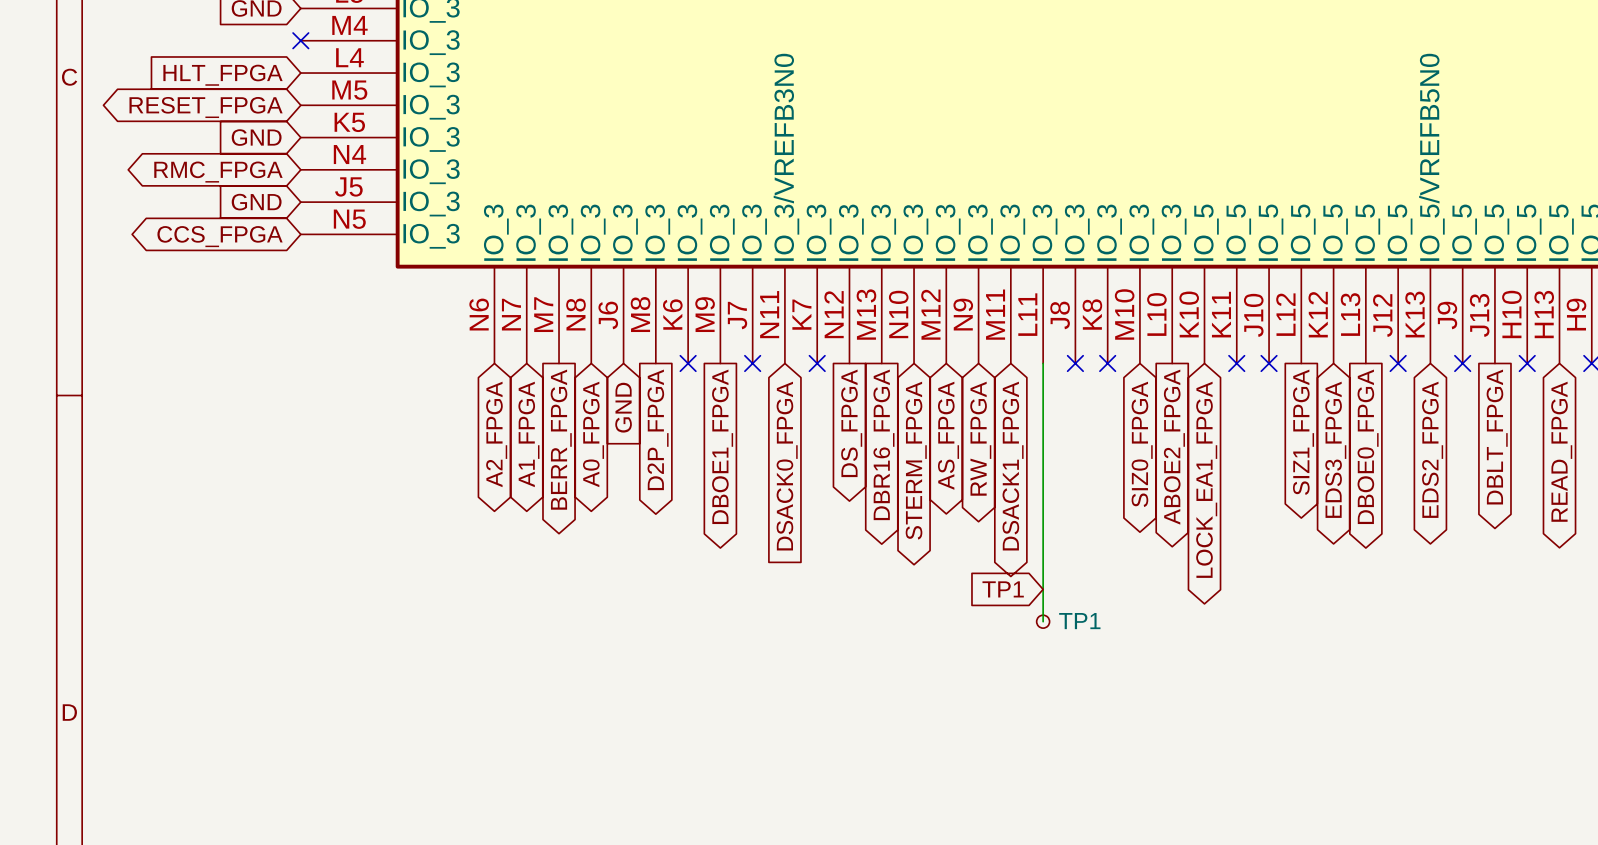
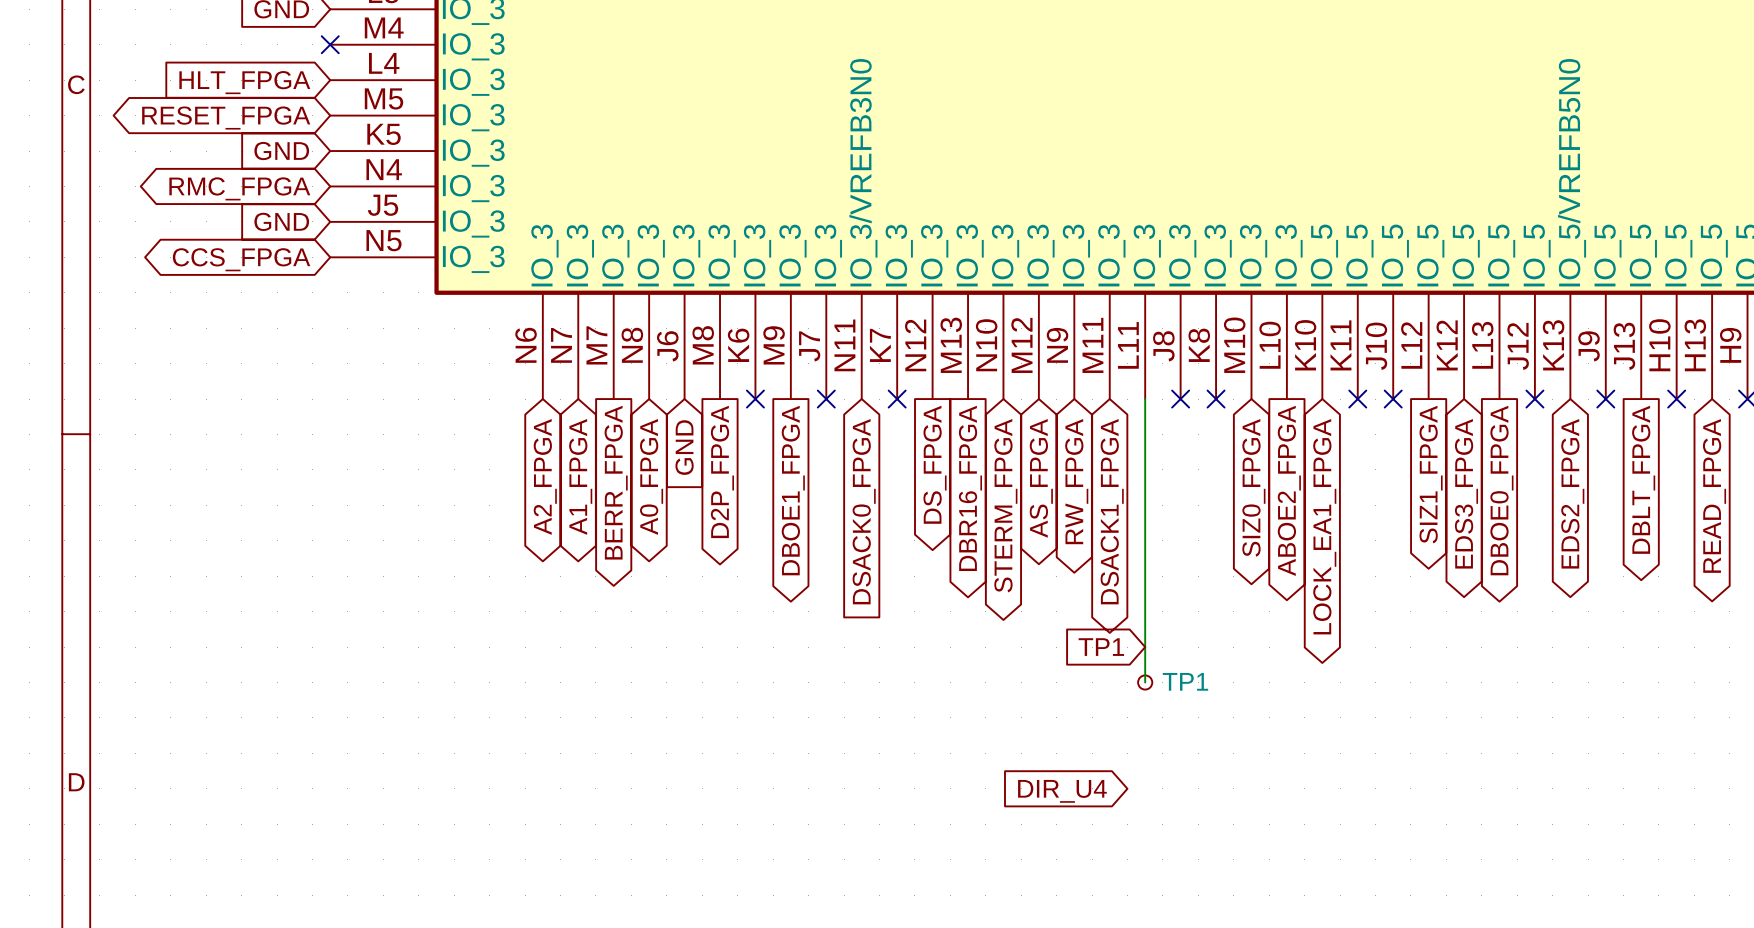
global label: none -> DIR_U4 (1062, 791)

